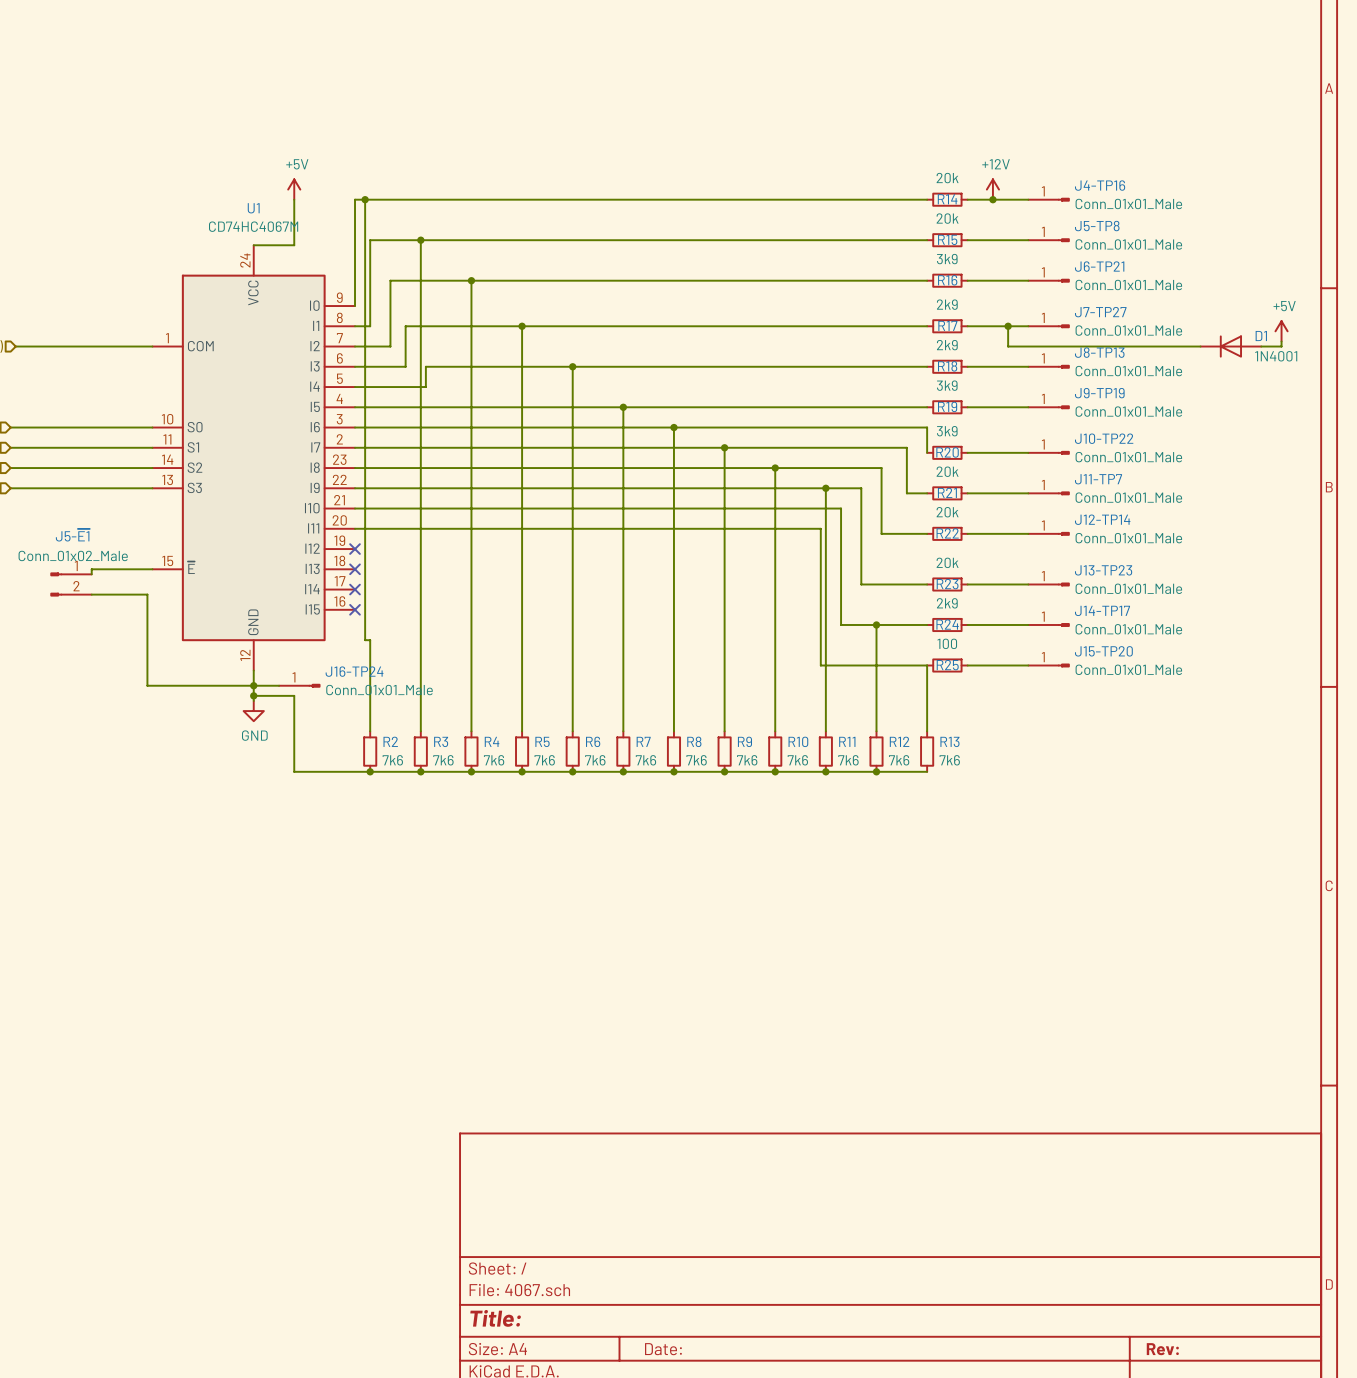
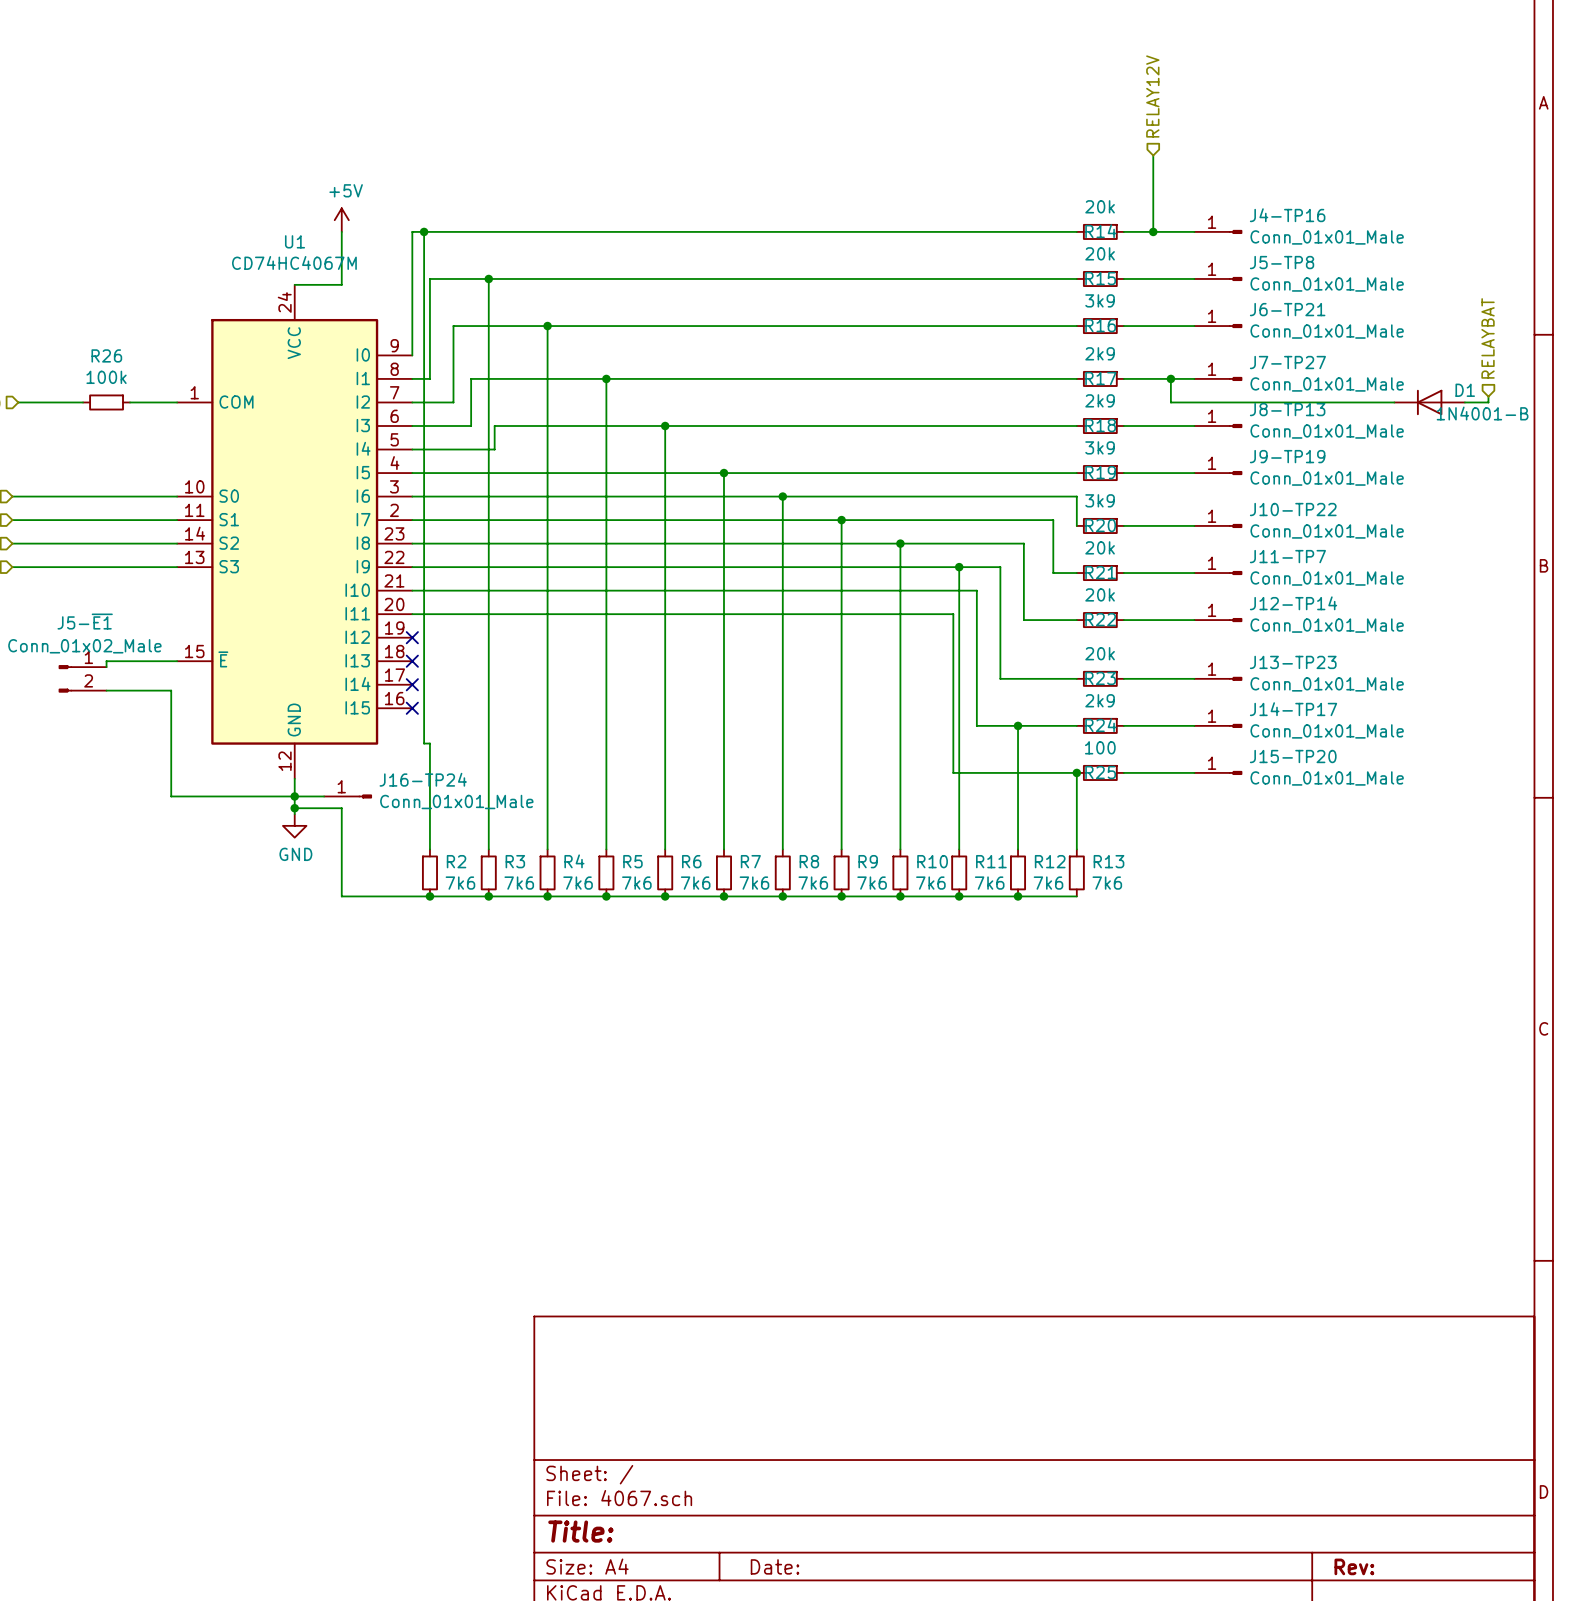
hierarchical label: none -> RELAY12V (1152, 96)
wire: none -> (1153, 155) (1153, 231)
power symbol: +12V (992, 189) -> none
hierarchical label: none -> RELAYBAT (1488, 338)
power symbol: +5V (1281, 331) -> none
wire: (71, 346) (111, 346) -> none
R26: none -> 100k (106, 402)
D1 value: 1N4001 (1276, 356) -> 1N4001-B (1482, 413)
junction: none -> (1076, 772)

